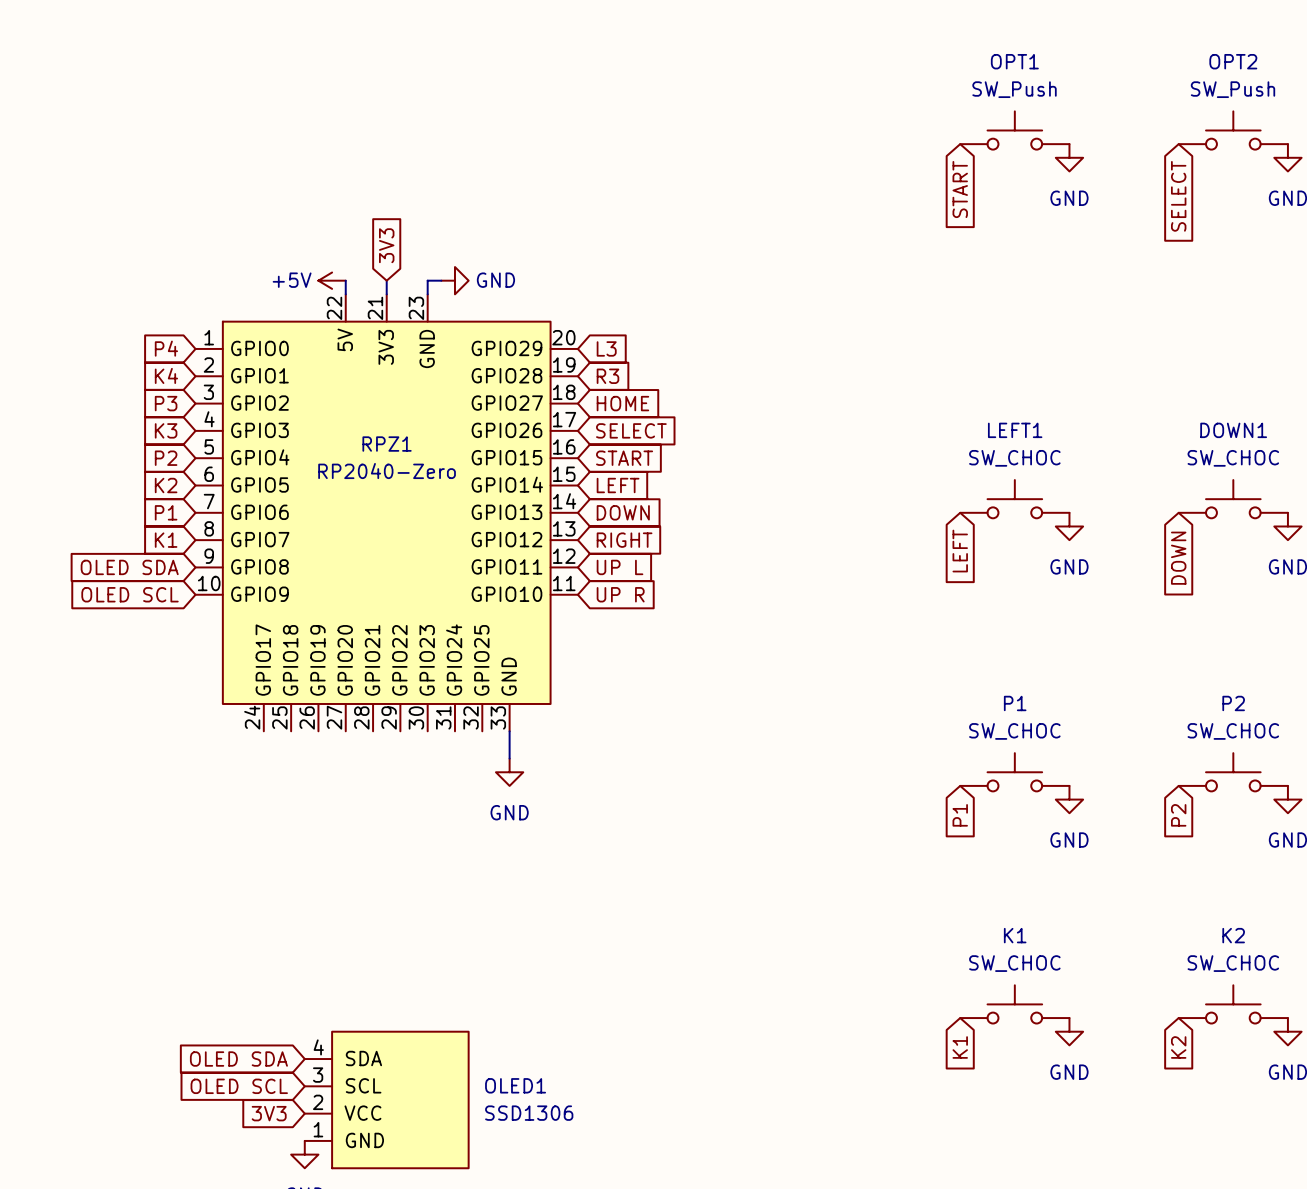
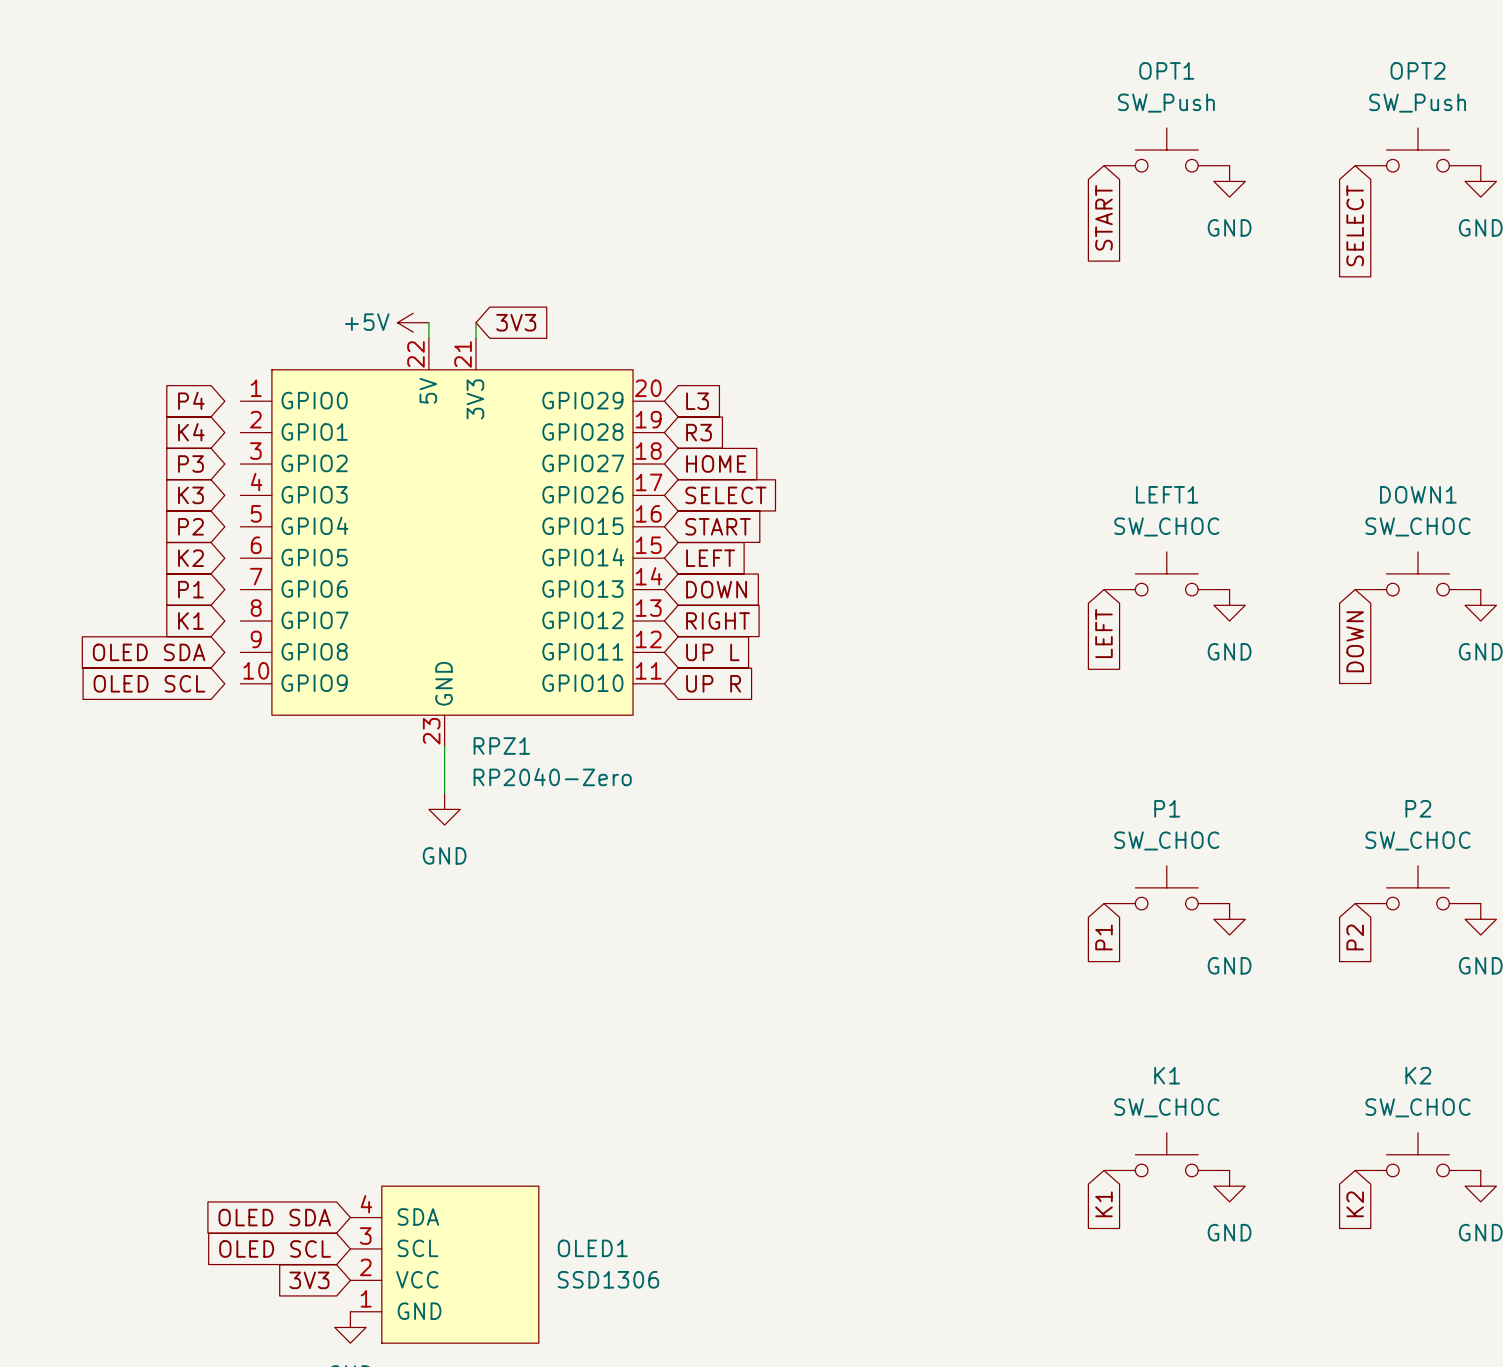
global label rotation: 0° (386, 245) -> 90° clockwise (516, 322)
power symbol position: +5V (332, 280) -> +5V (413, 322)
wire: (345, 280) (345, 294) -> (428, 322) (428, 338)
wire: (386, 280) (386, 294) -> (476, 322) (476, 338)
wire: (441, 280) (427, 280) (427, 294) -> none
power symbol: GND (454, 280) -> none
RPZ1 symbol: [195, 294, 578, 732] -> [240, 338, 665, 747]
RPZ1 name position: RPZ1 (387, 444) -> RPZ1 (501, 746)
RPZ1 value position: RP2040-Zero (387, 471) -> RP2040-Zero (552, 777)
wire: (509, 731) (509, 758) -> none
power symbol position: GND (509, 772) -> GND (444, 809)

